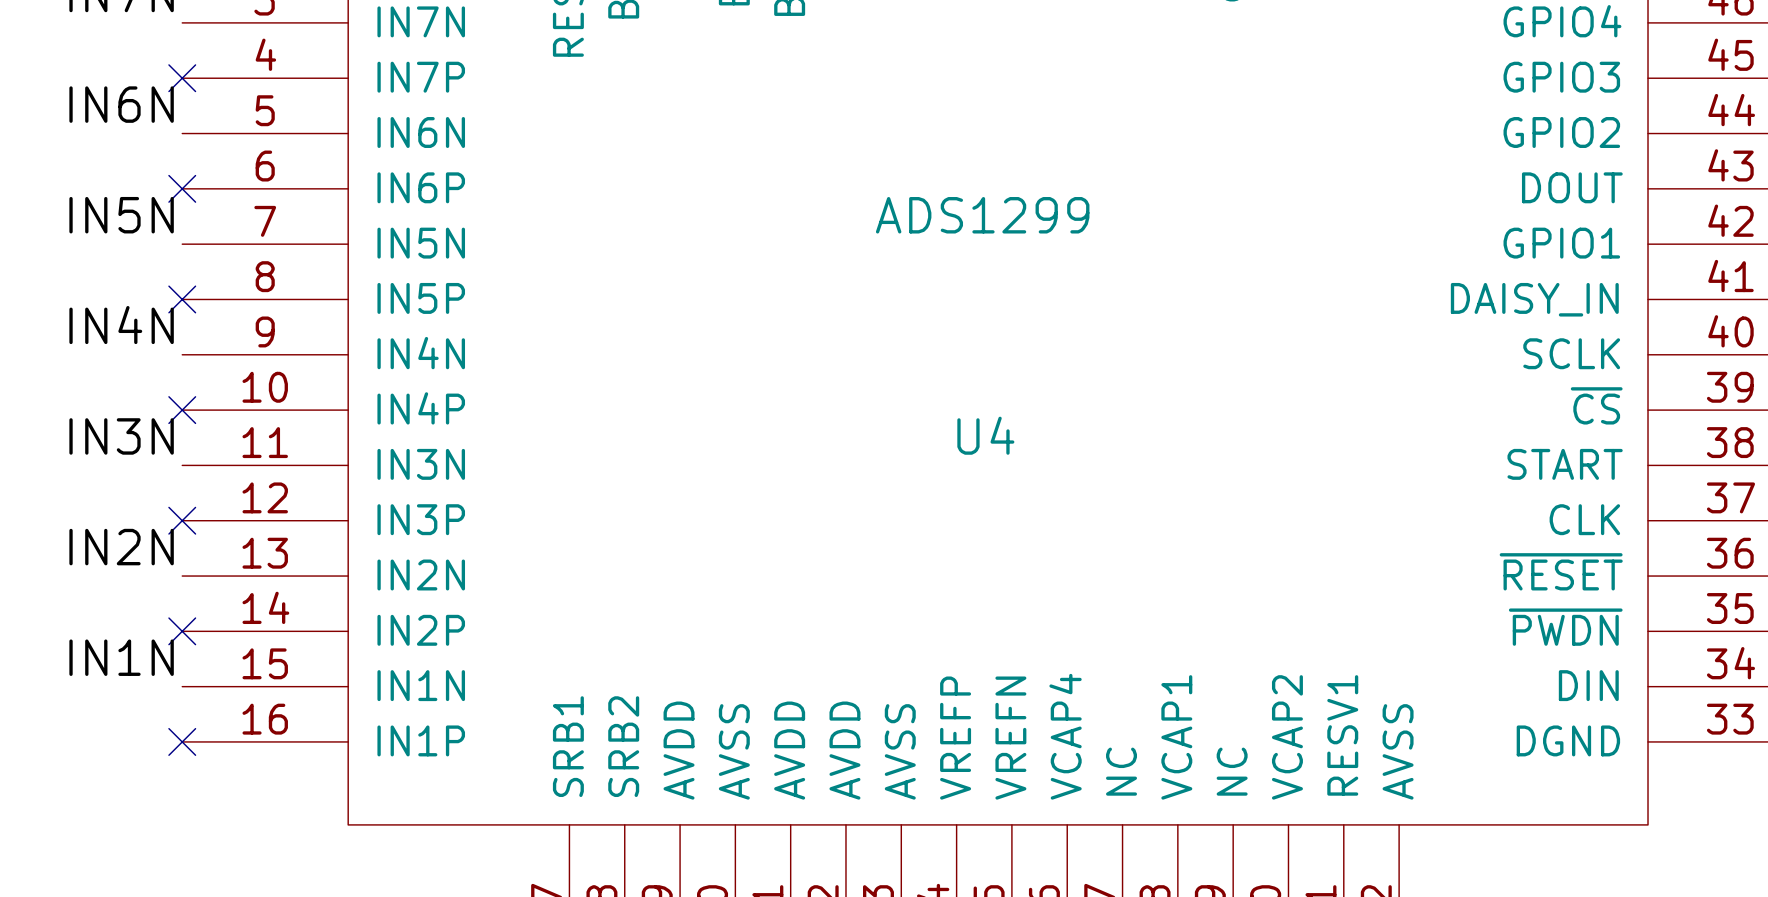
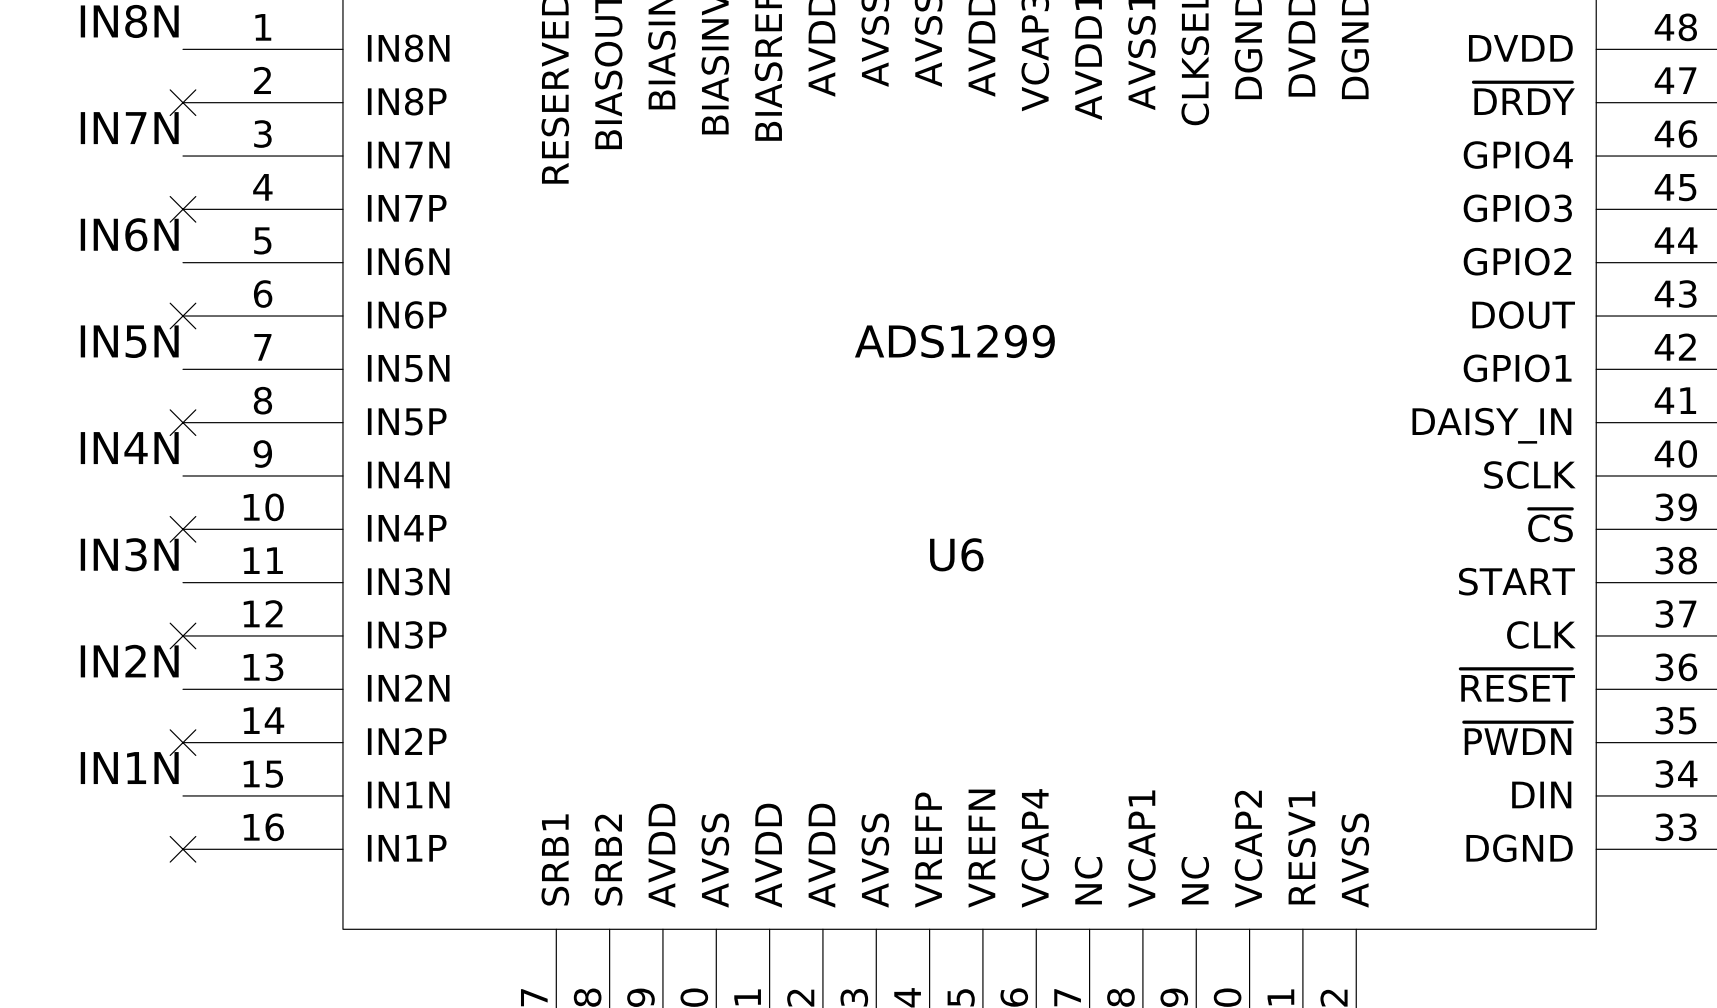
U4 name: U4 (985, 435) -> U6 (956, 554)

